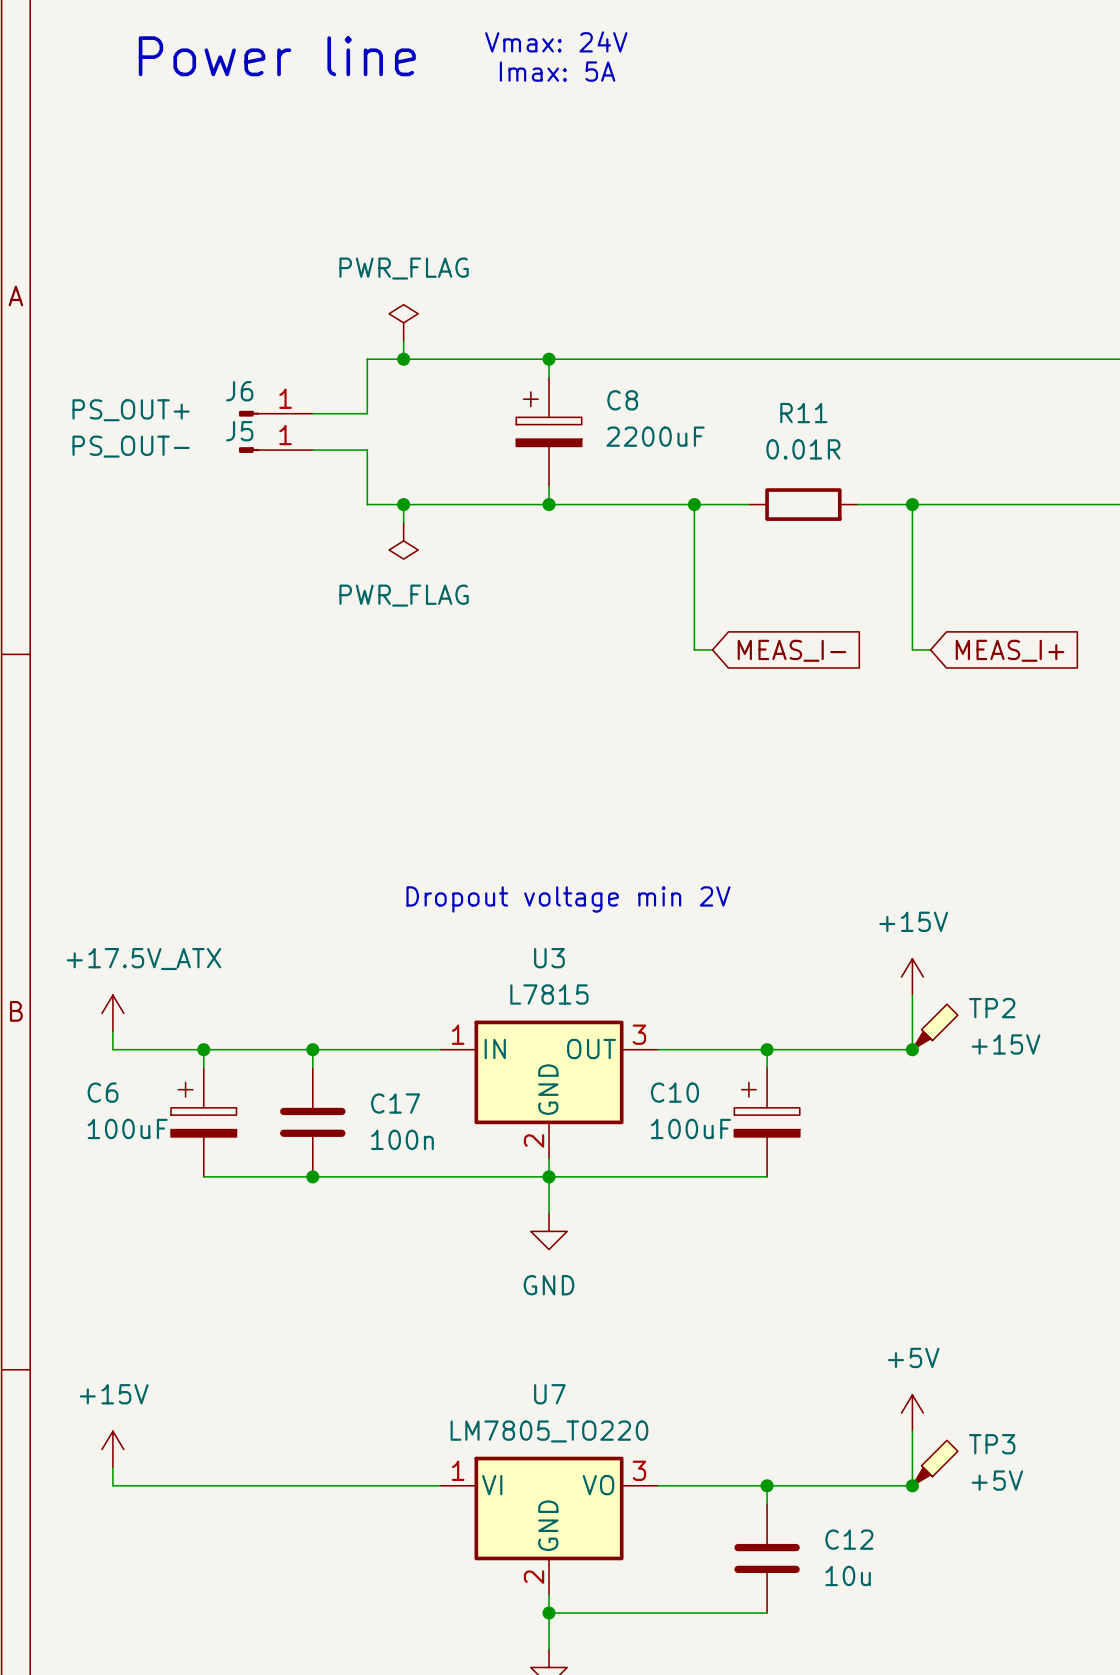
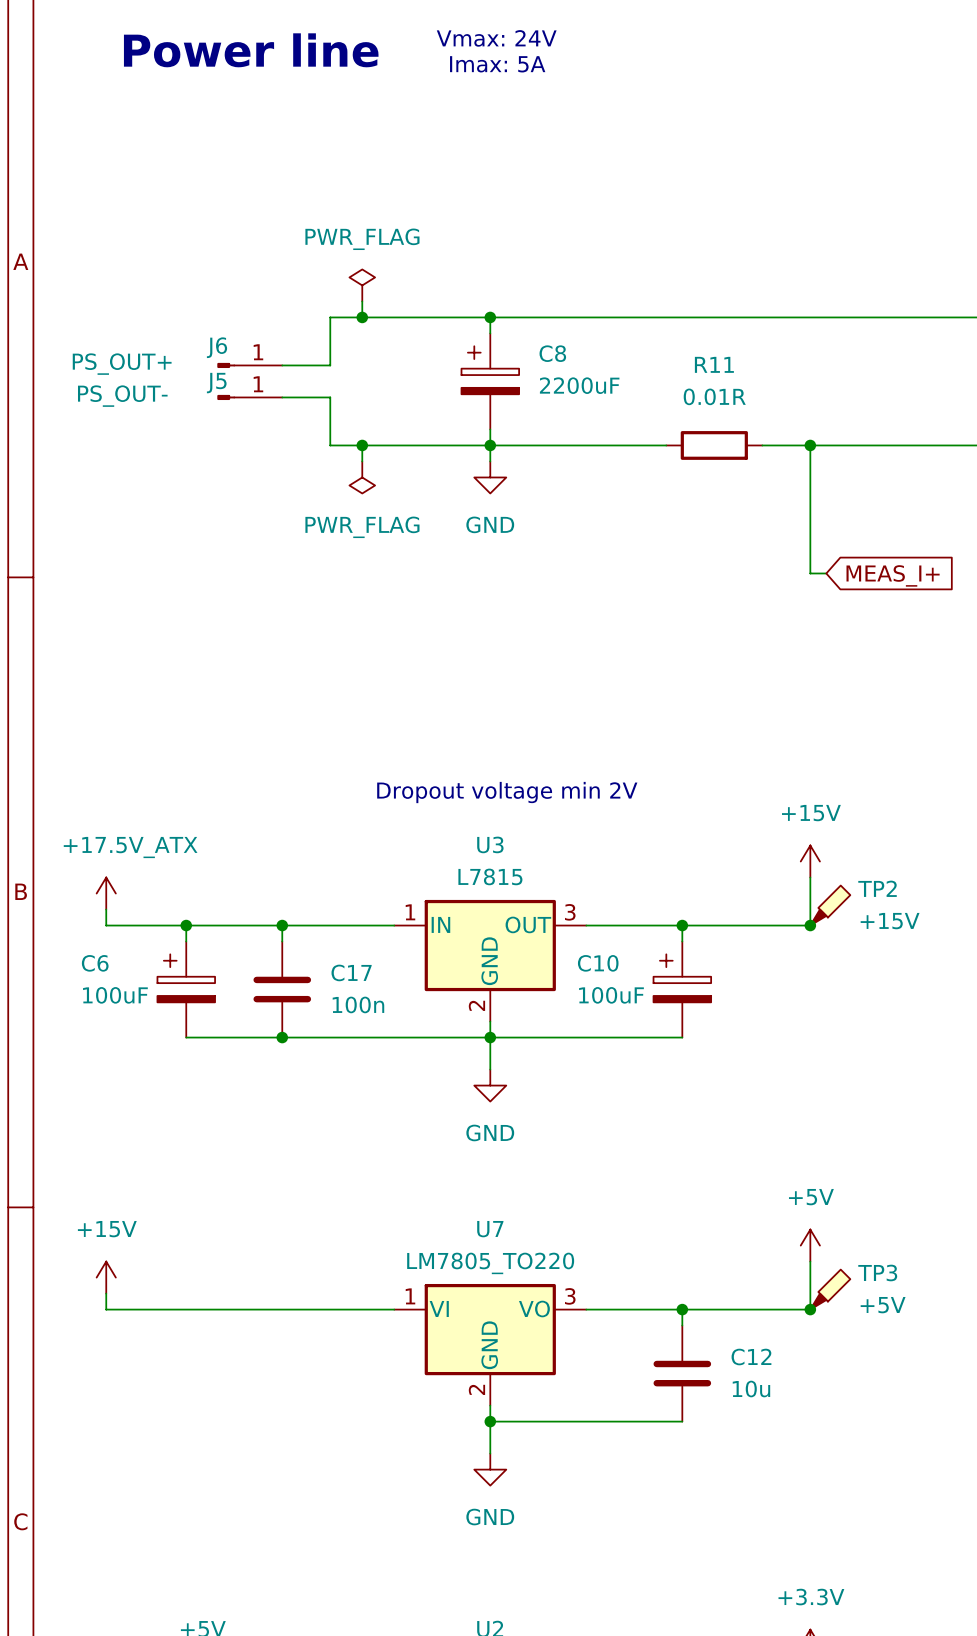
wire: none -> (490, 445) (490, 461)
wire: (694, 504) (694, 649) (712, 649) -> none
junction: (694, 504) -> none
power symbol: none -> GND (490, 477)
global label: MEAS_I- (791, 650) -> none

